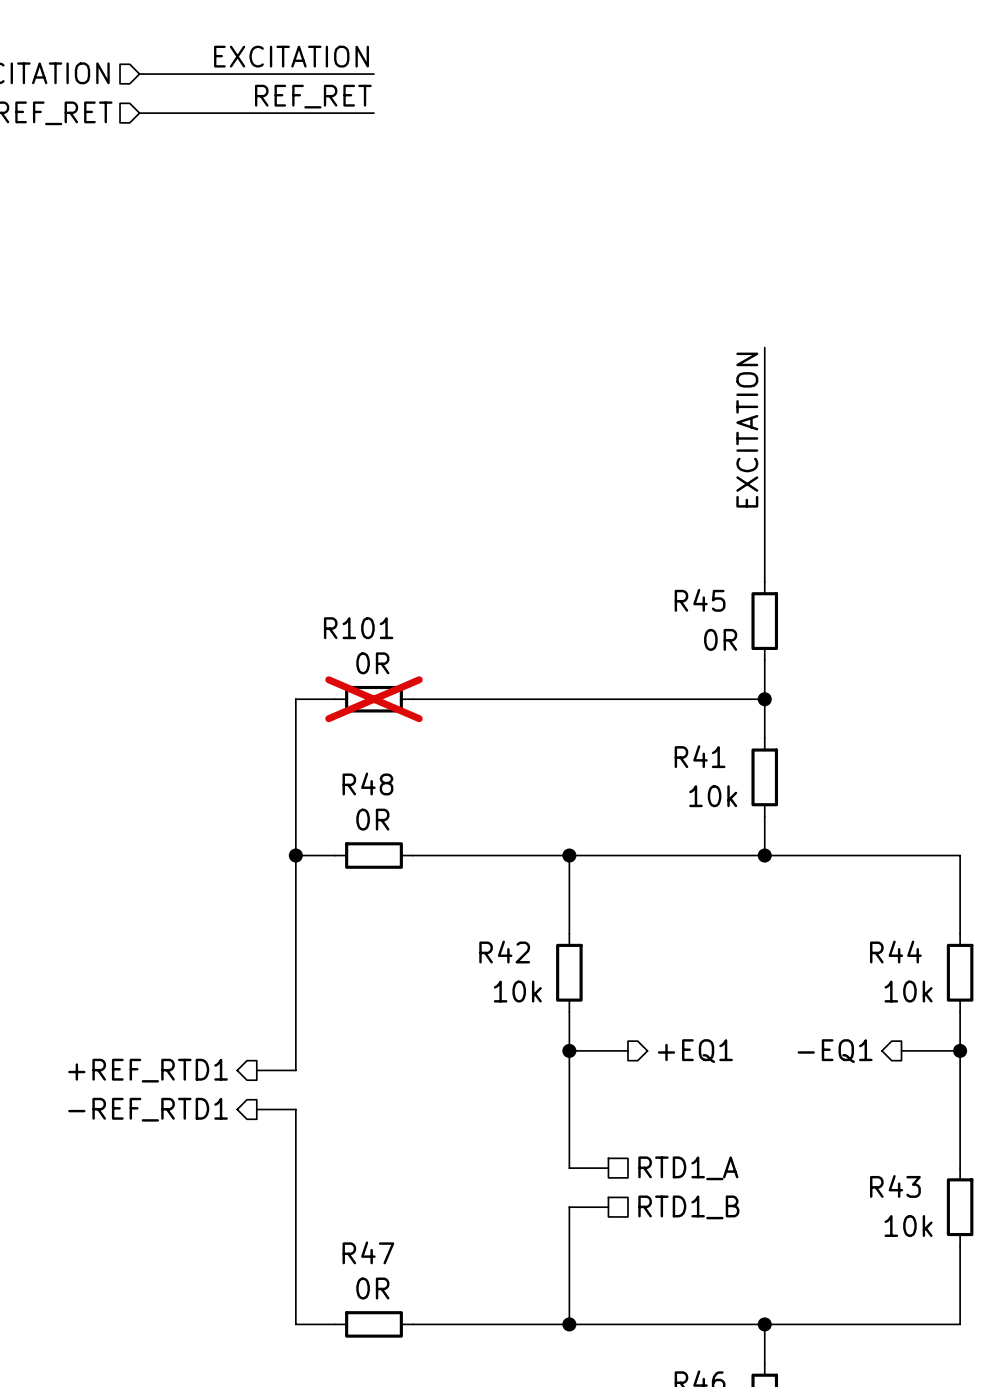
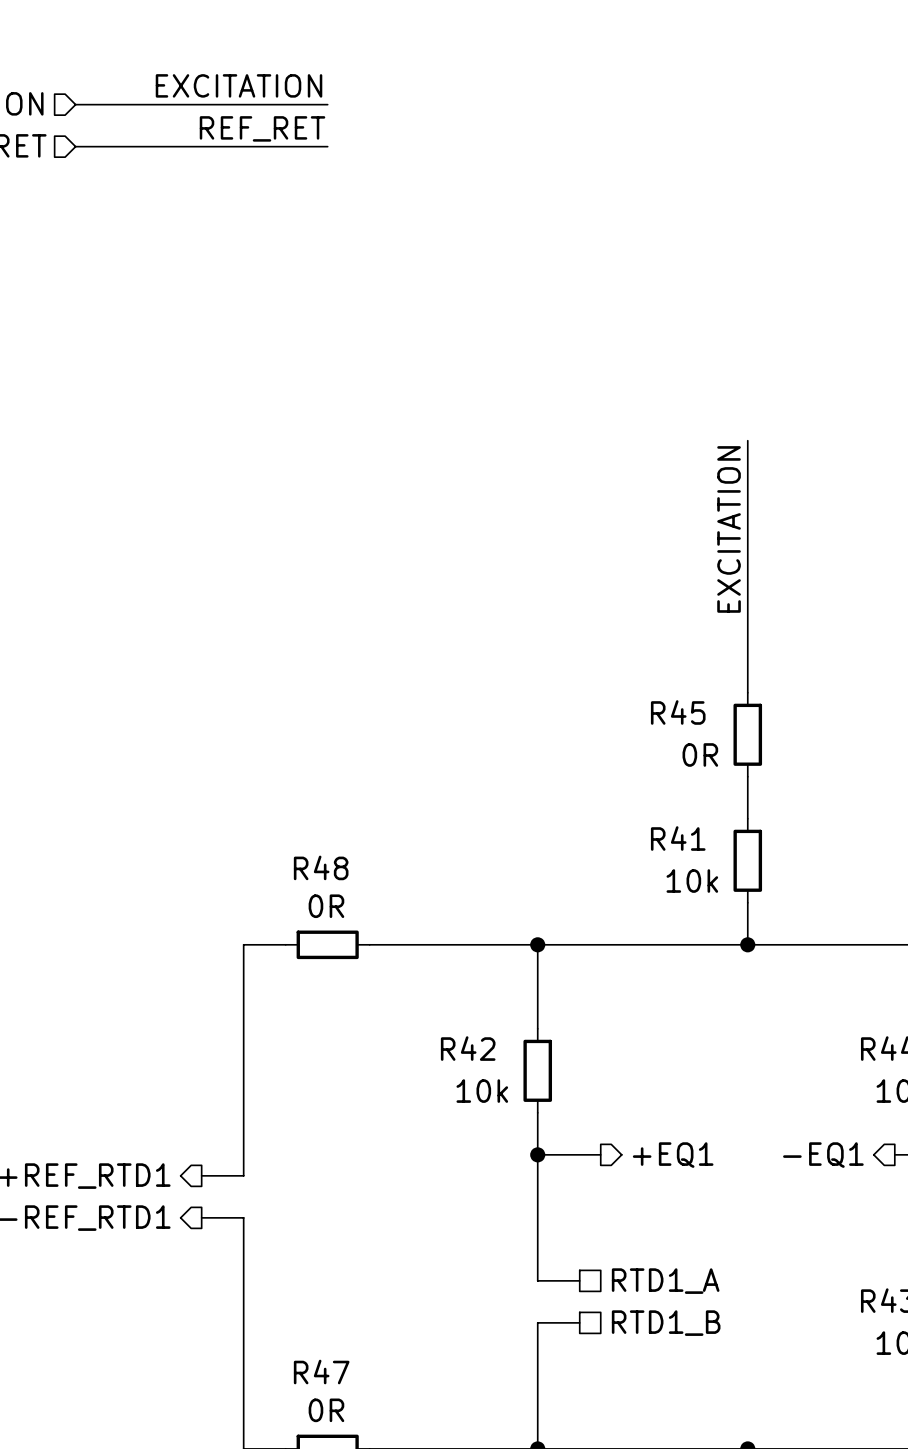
wire: (764, 347) (764, 386) -> (747, 650) (747, 692)
label position: EXCITATION (747, 430) -> EXCITATION (729, 529)
R45 position: (764, 621) -> (747, 734)
wire: (764, 660) (764, 699) (413, 699) -> none
wire: (334, 699) (295, 699) (295, 855) -> none
R101: 0R (374, 699) -> none
junction: (764, 699) -> none
junction: (295, 855) -> none

